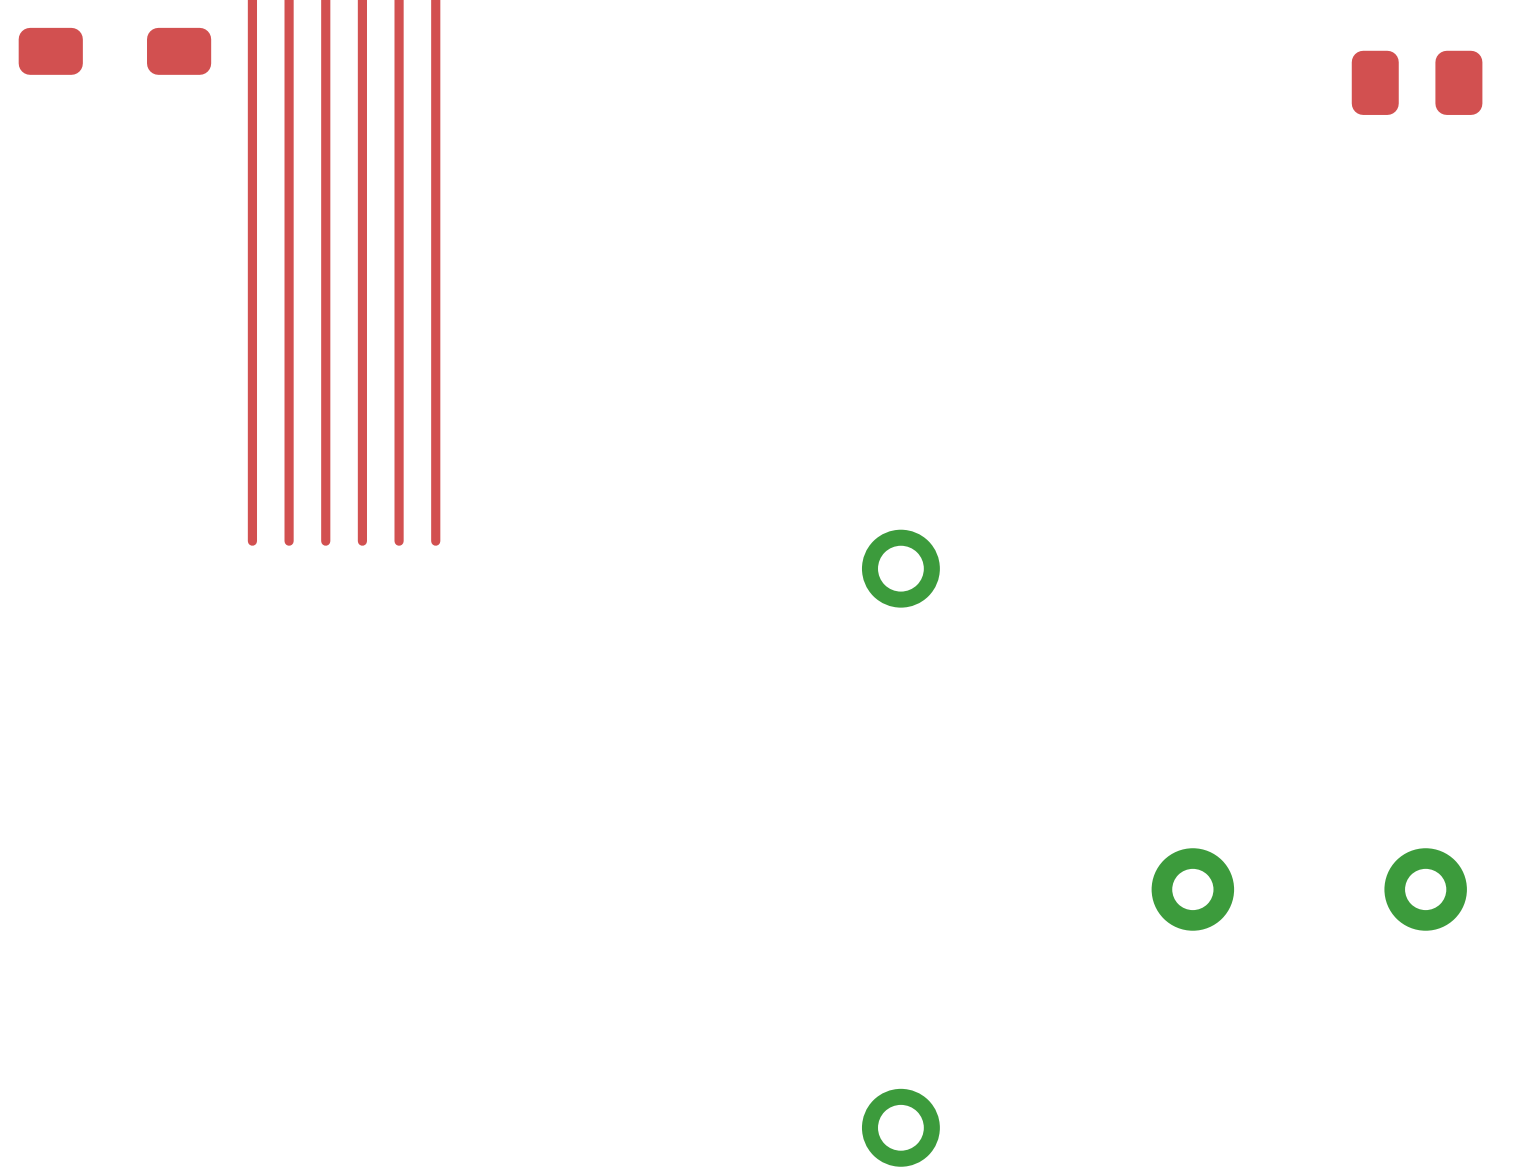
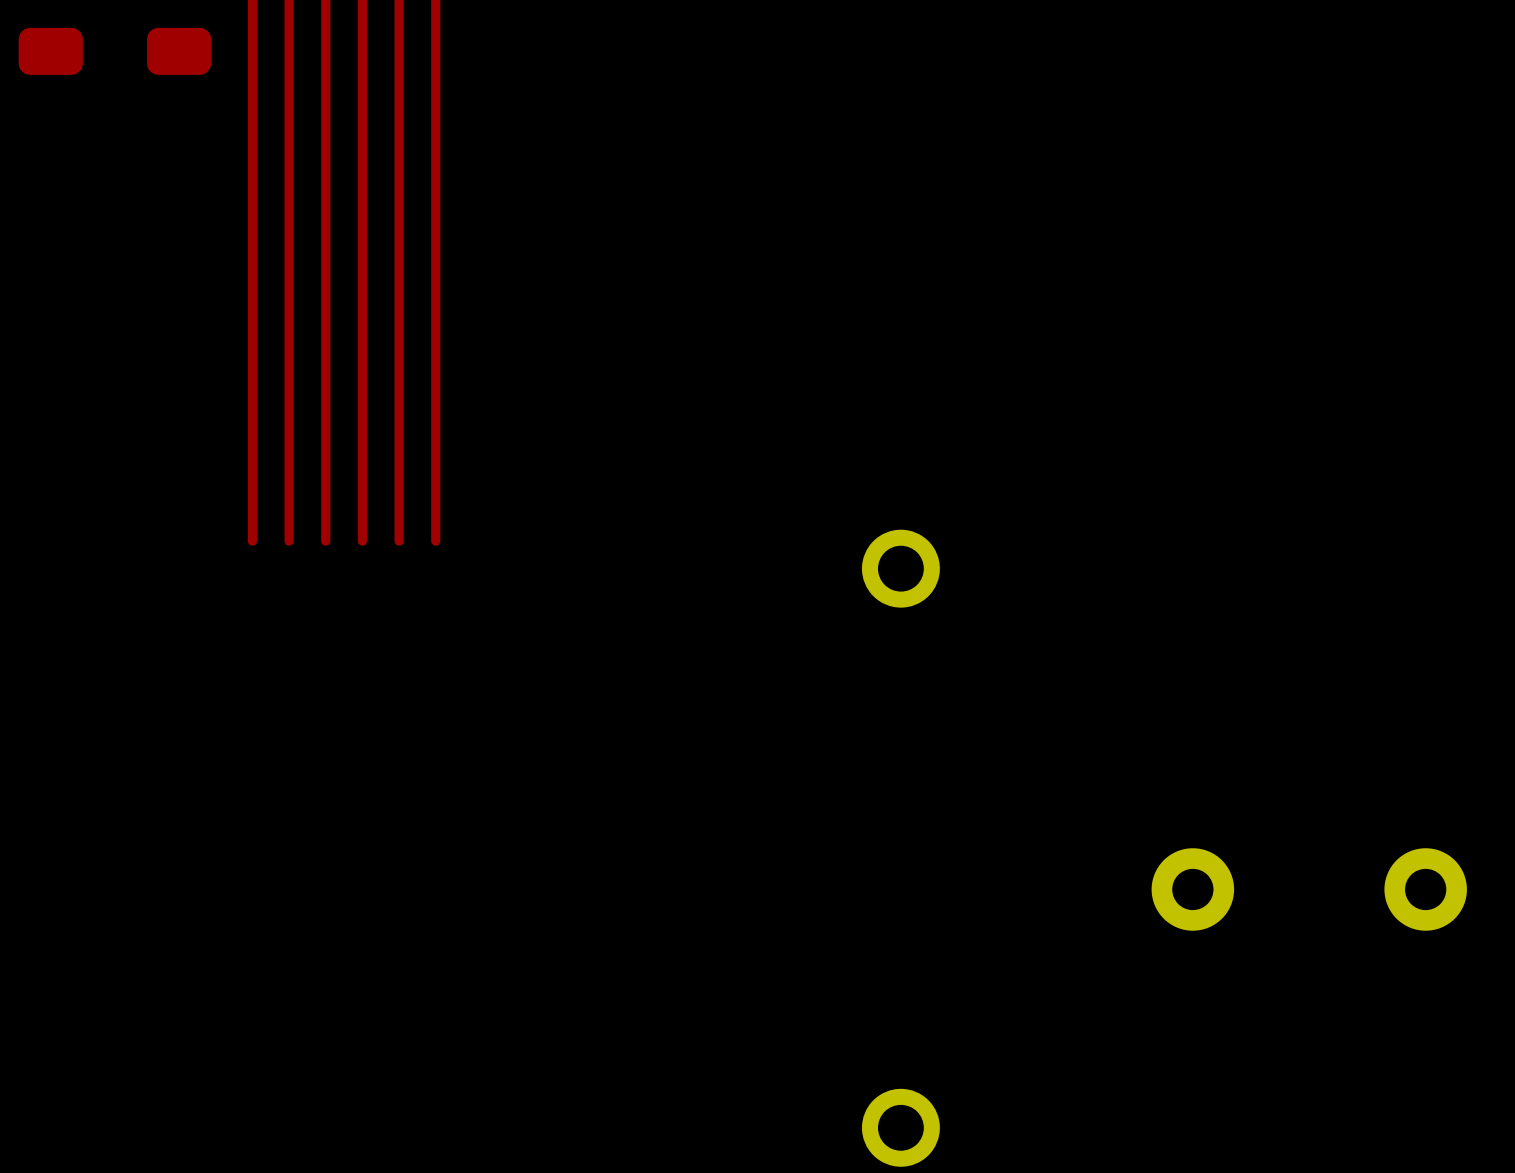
part: (1417, 82) -> none

